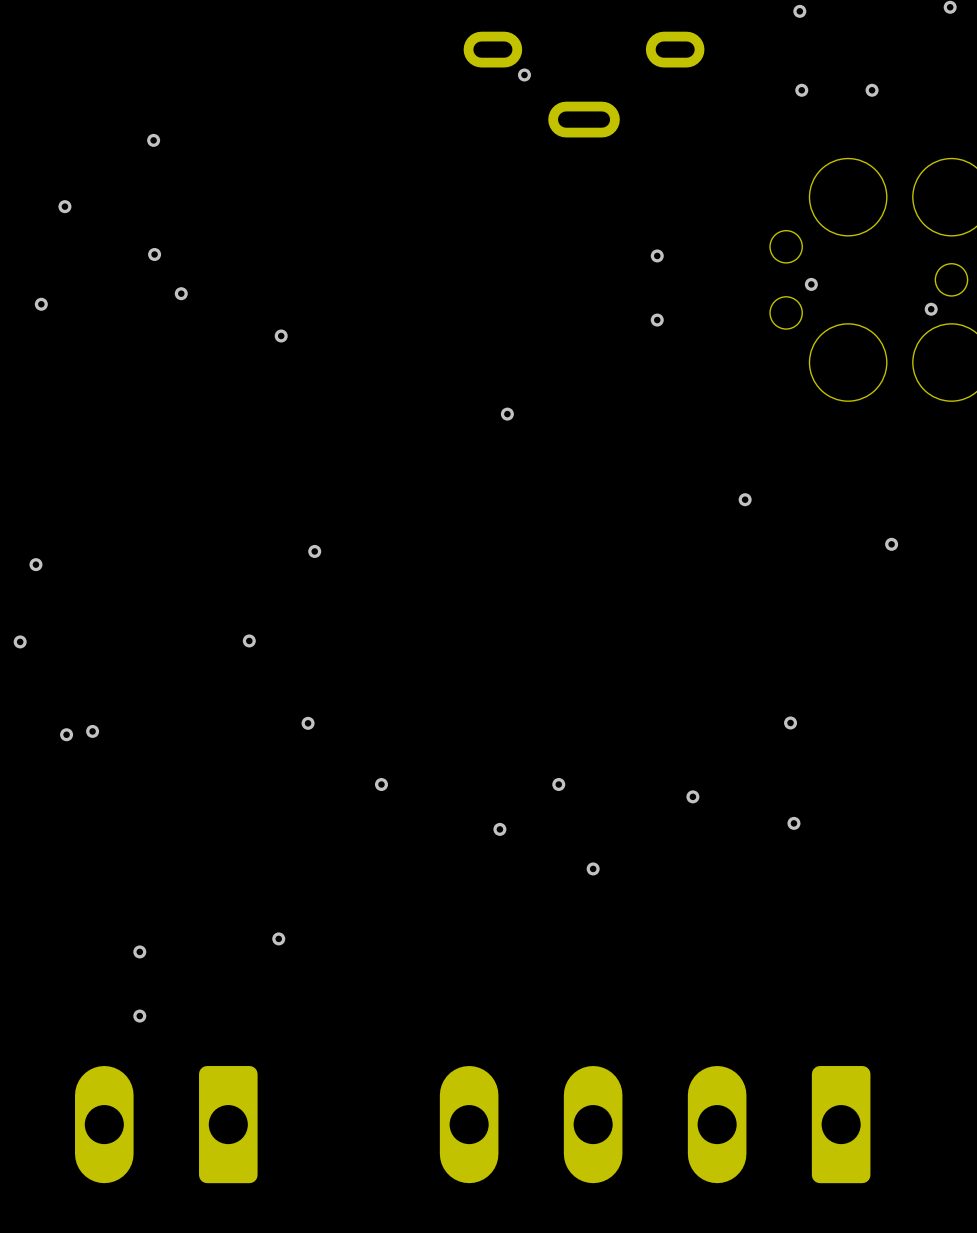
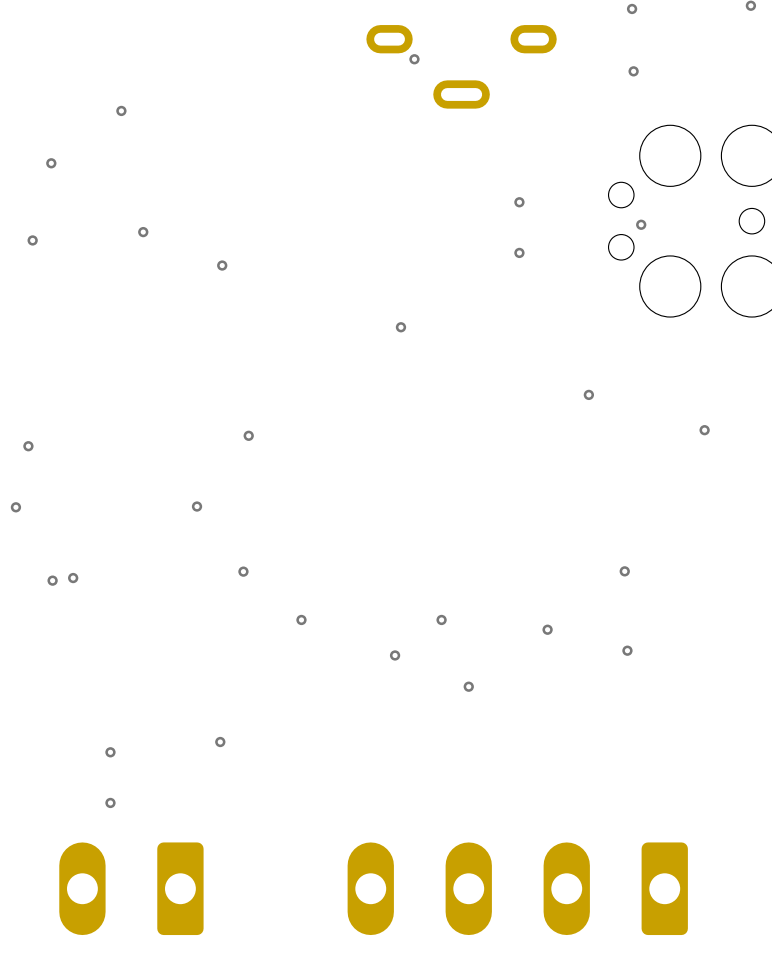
via: (872, 90) -> none
via: (154, 254) -> none
via: (931, 309) -> none

